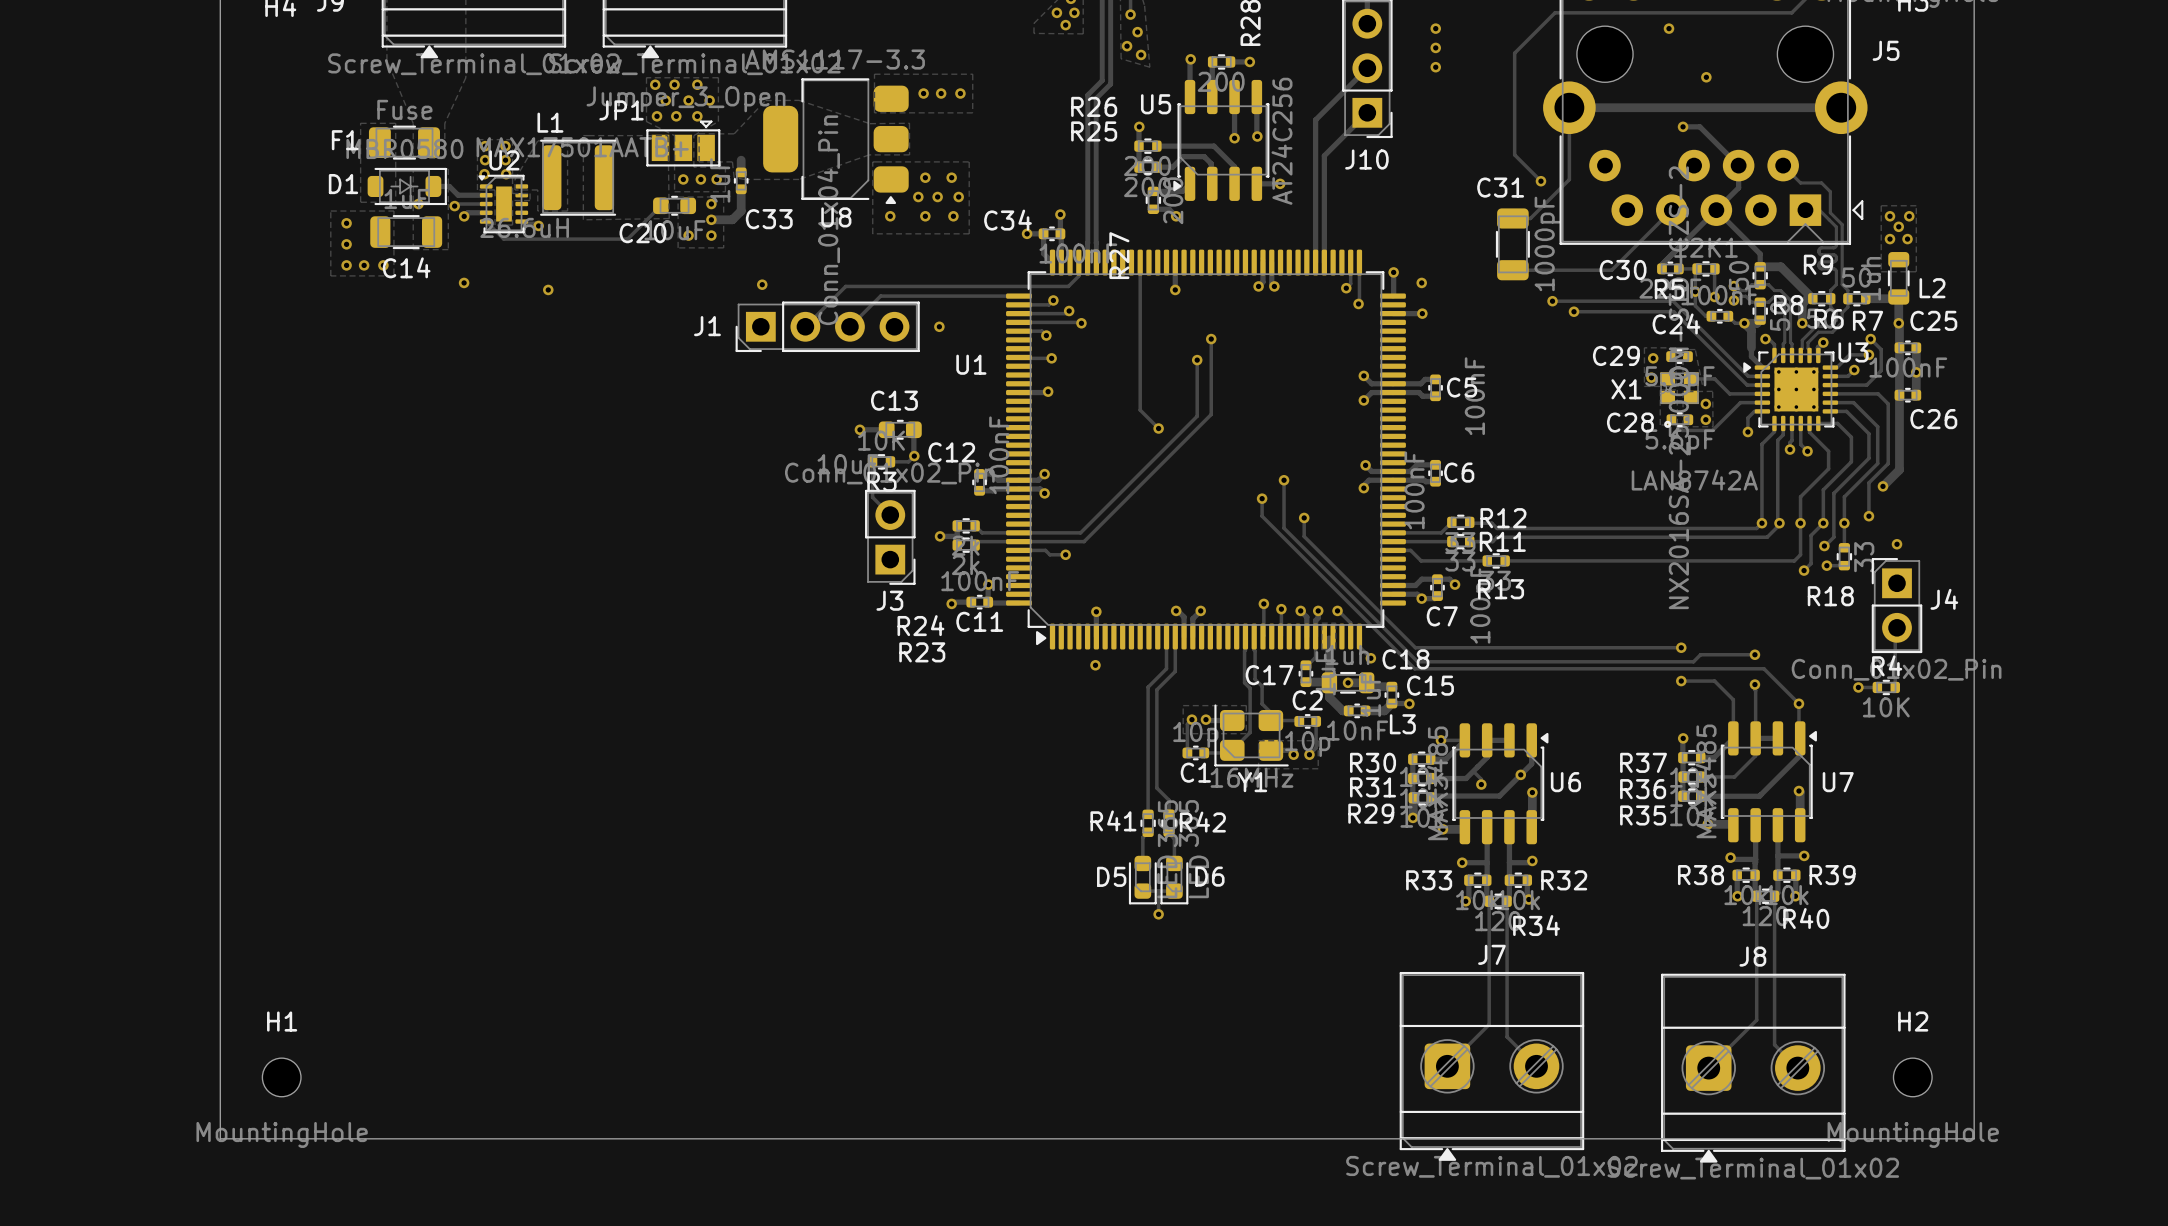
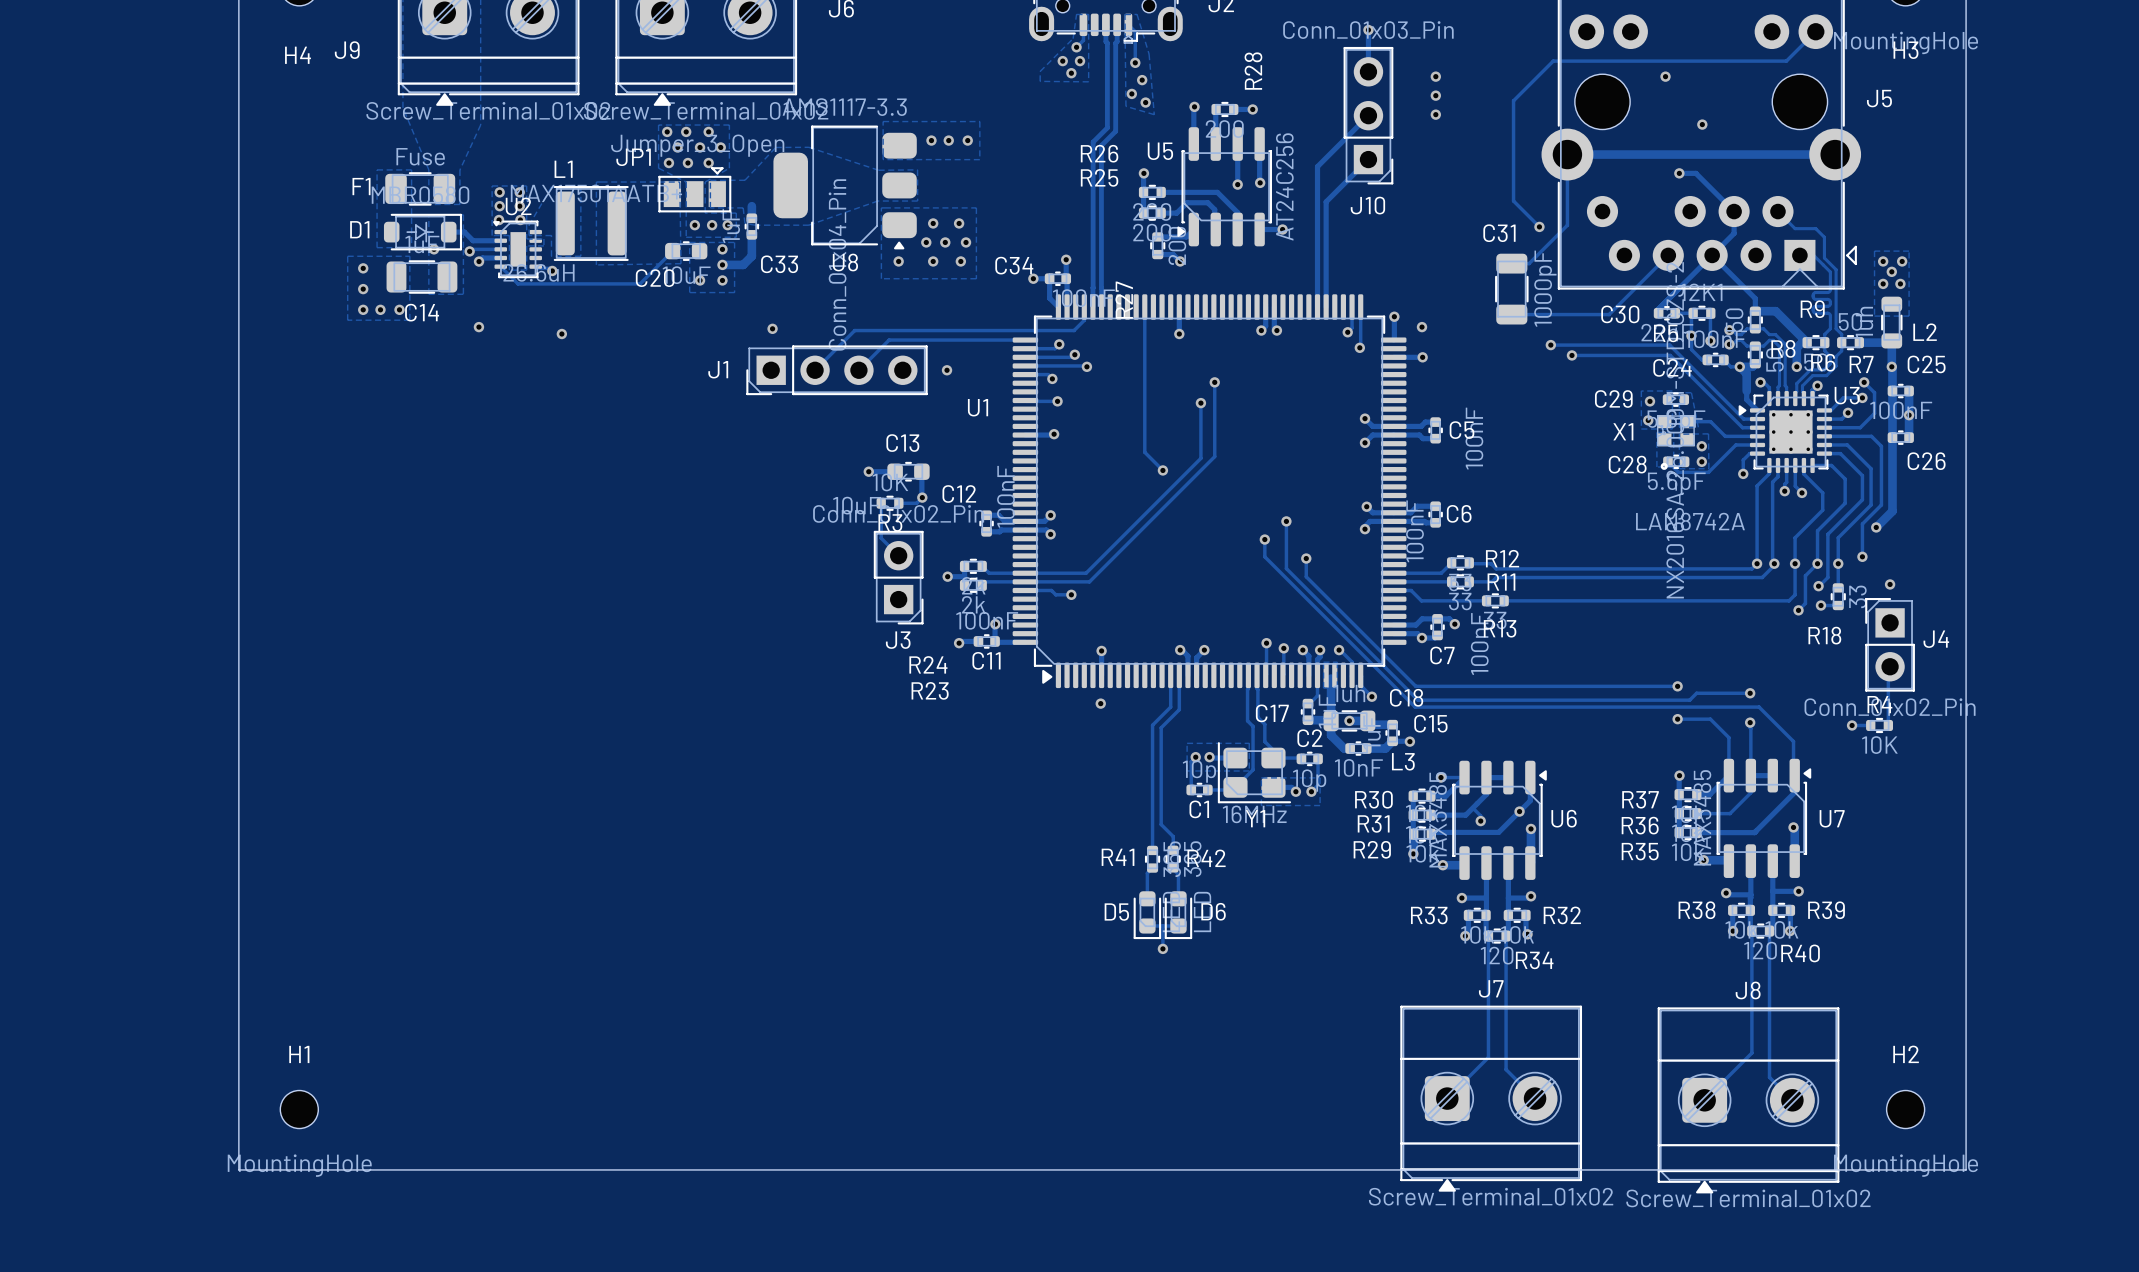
via: (1798, 703) -> none

